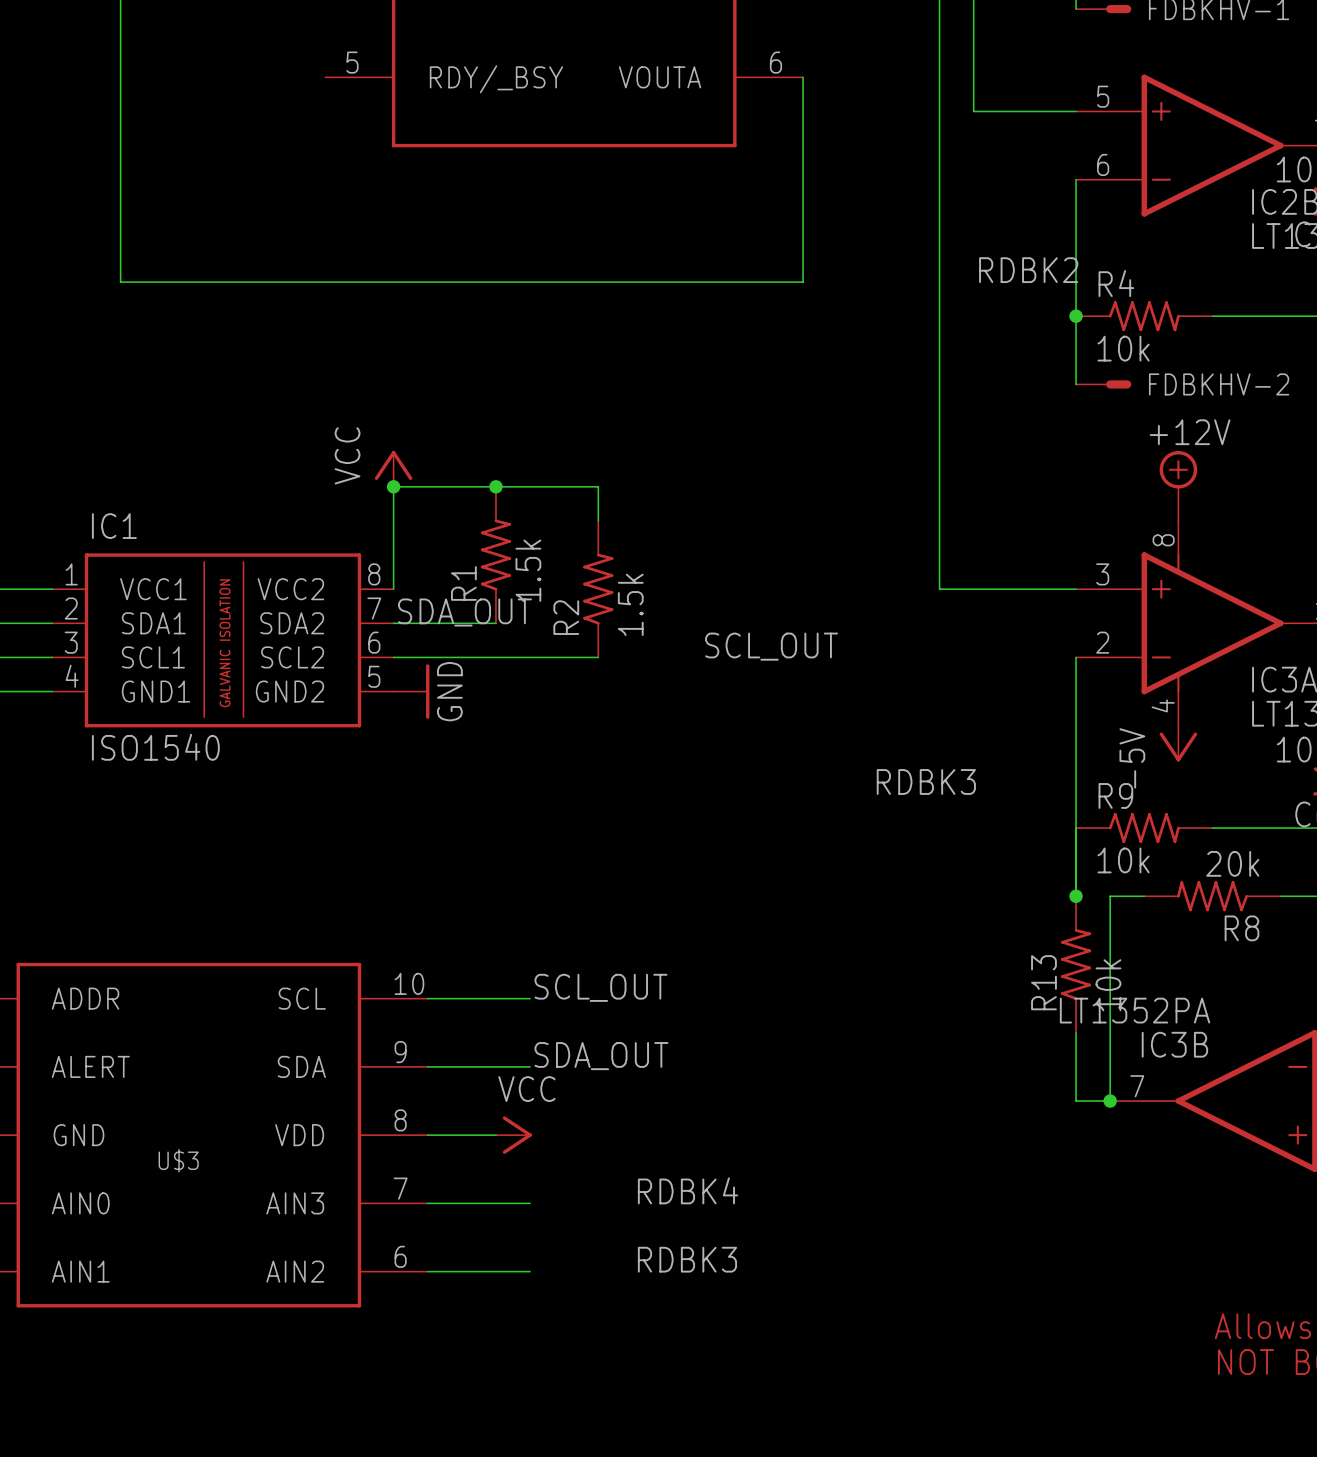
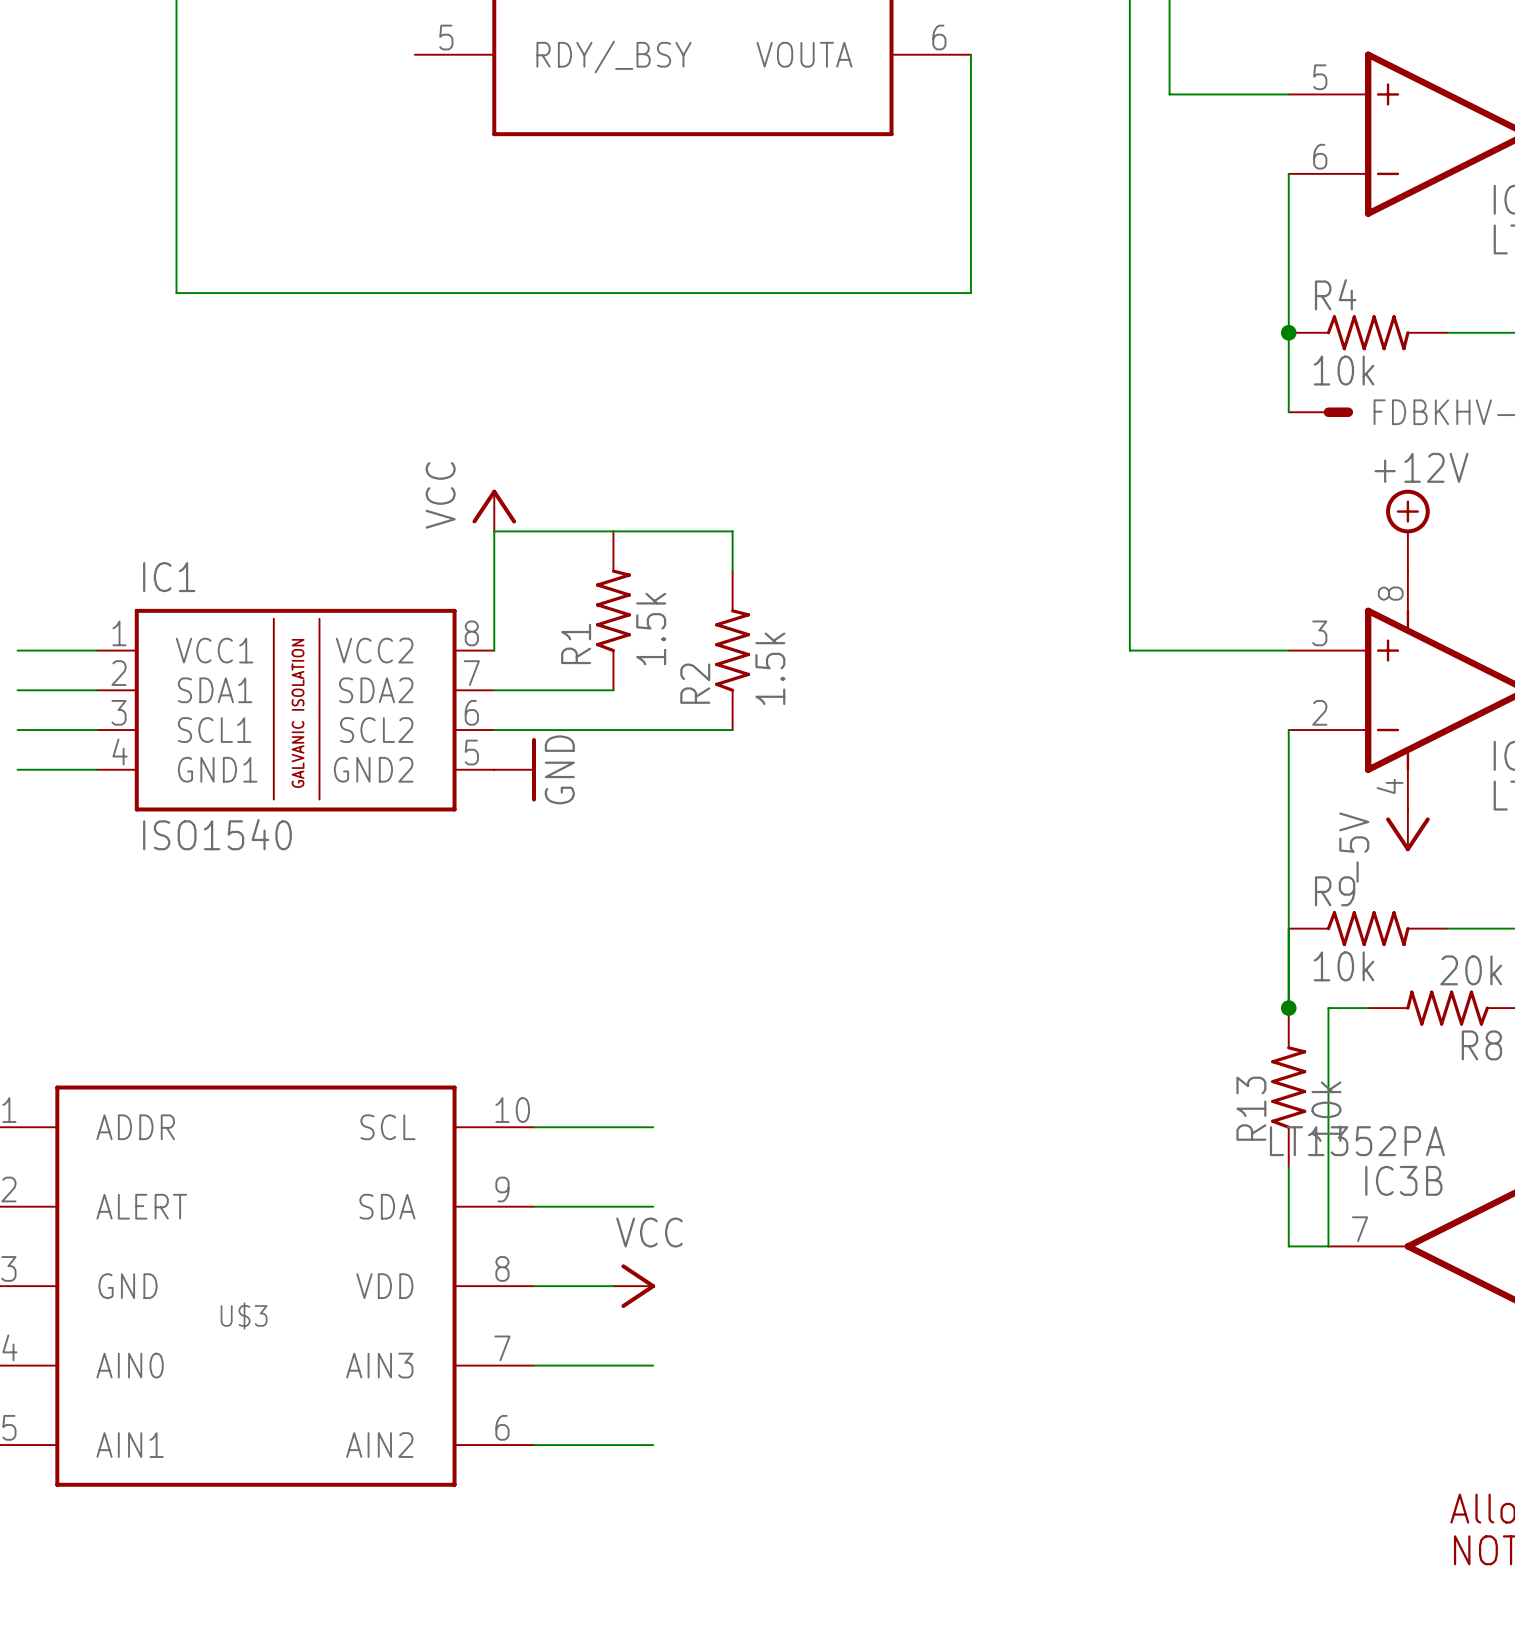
label: RDBK2 (1028, 270) -> none
junction: (393, 486) -> none
junction: (495, 486) -> none
label: SDA_OUT (464, 612) -> none
label: SCL_OUT (771, 646) -> none
label: RDBK3 (926, 781) -> none
label: SCL_OUT (600, 987) -> none
label: SDA_OUT (601, 1056) -> none
junction: (1110, 1101) -> none
label: RDBK4 (687, 1190) -> none
label: RDBK3 (687, 1259) -> none

